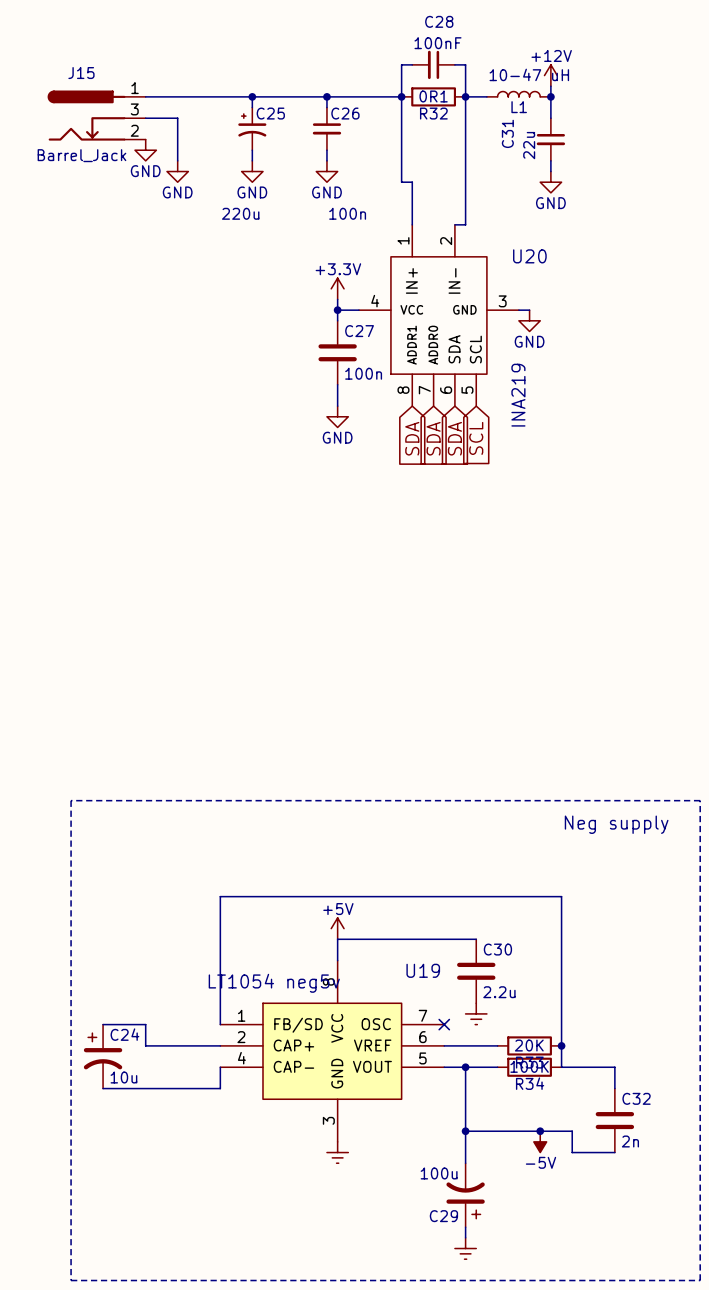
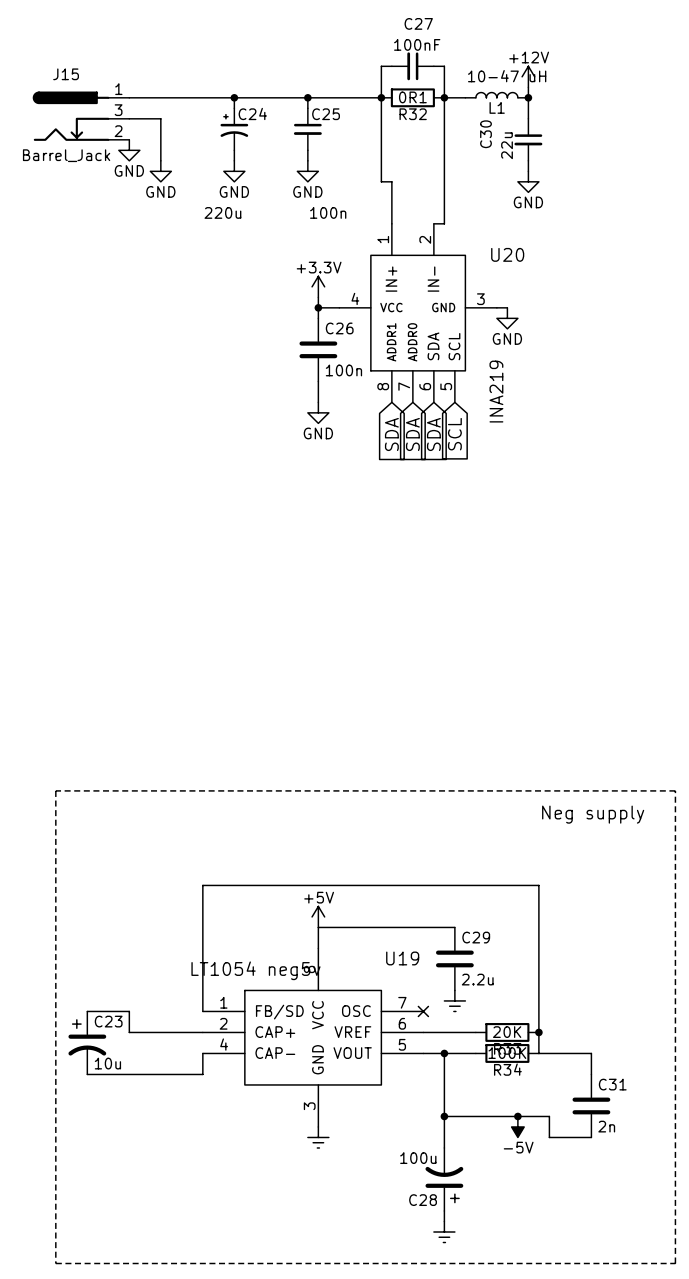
C28 name: C28 (439, 21) -> C27 (418, 23)
C25 name: C25 (270, 113) -> C24 (252, 113)
C26 name: C26 (345, 113) -> C25 (326, 114)
C31 name: C31 (507, 133) -> C30 (486, 134)
C27 name: C27 (359, 331) -> C26 (339, 328)
C30 name: C30 (497, 949) -> C29 (476, 937)
C24 name: C24 (124, 1034) -> C23 (108, 1021)
C32 name: C32 (636, 1098) -> C31 (612, 1084)
C29 name: C29 (443, 1216) -> C28 (423, 1200)

